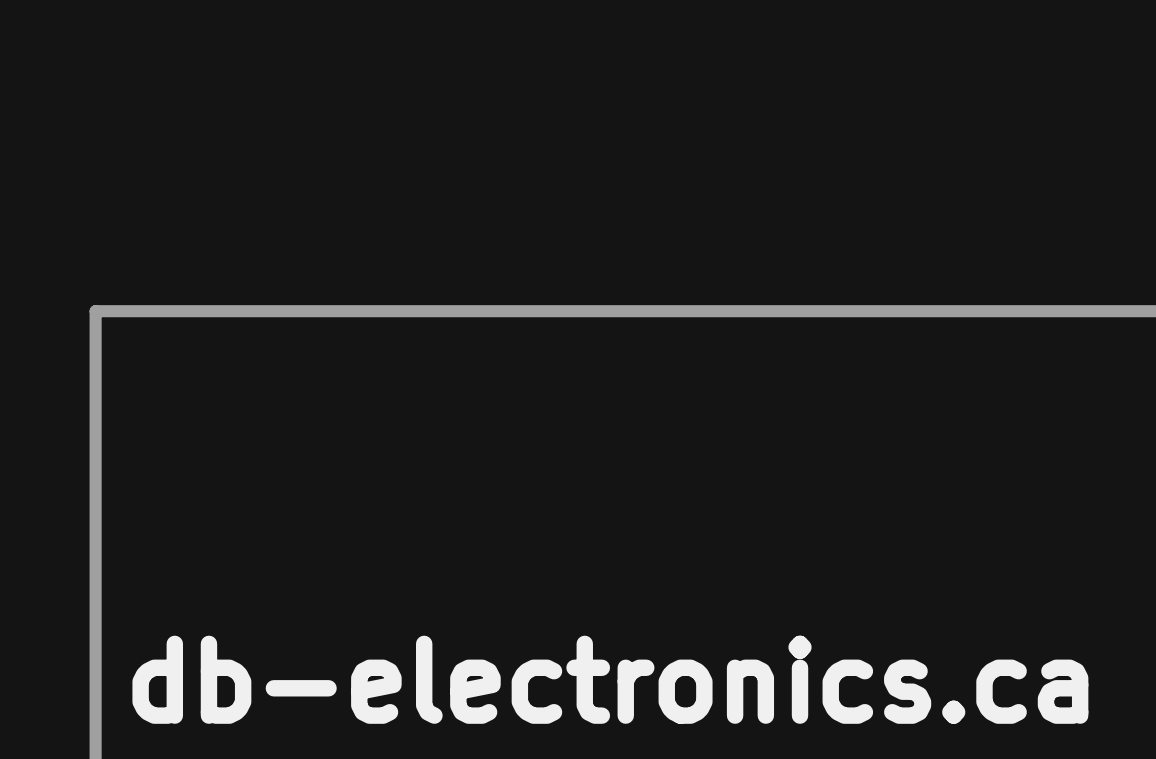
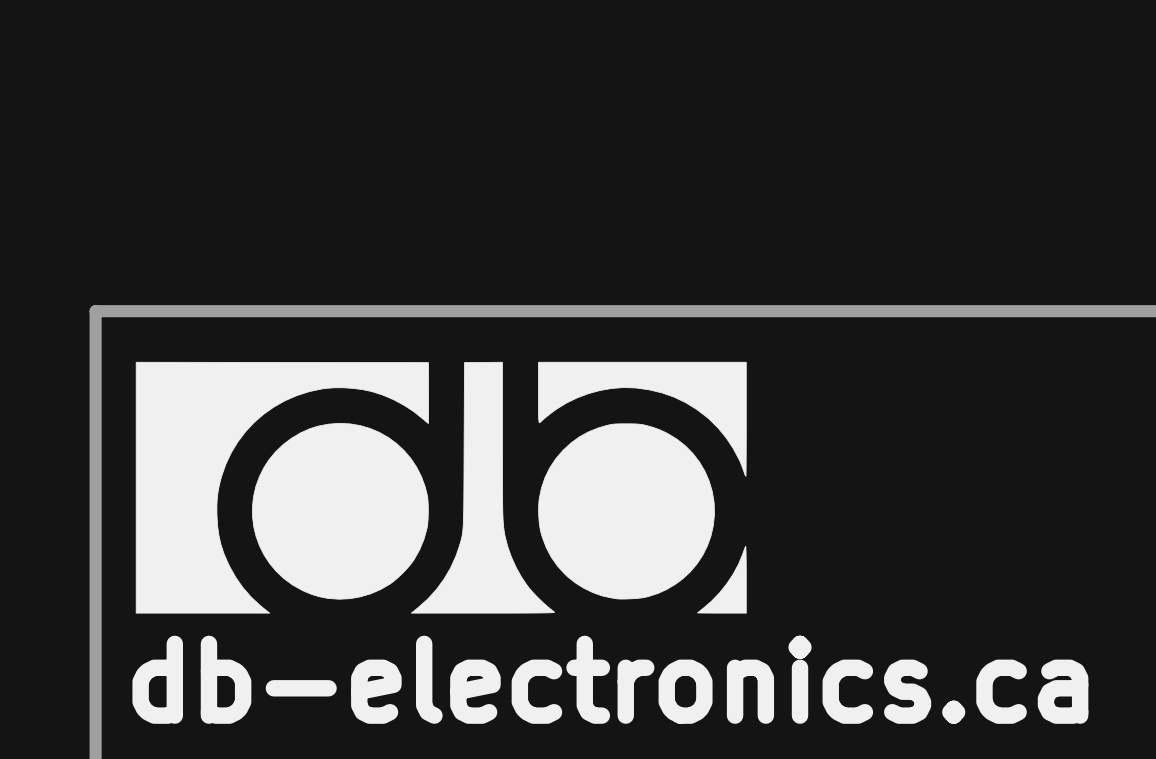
drawing: none -> [135, 361, 747, 614]

